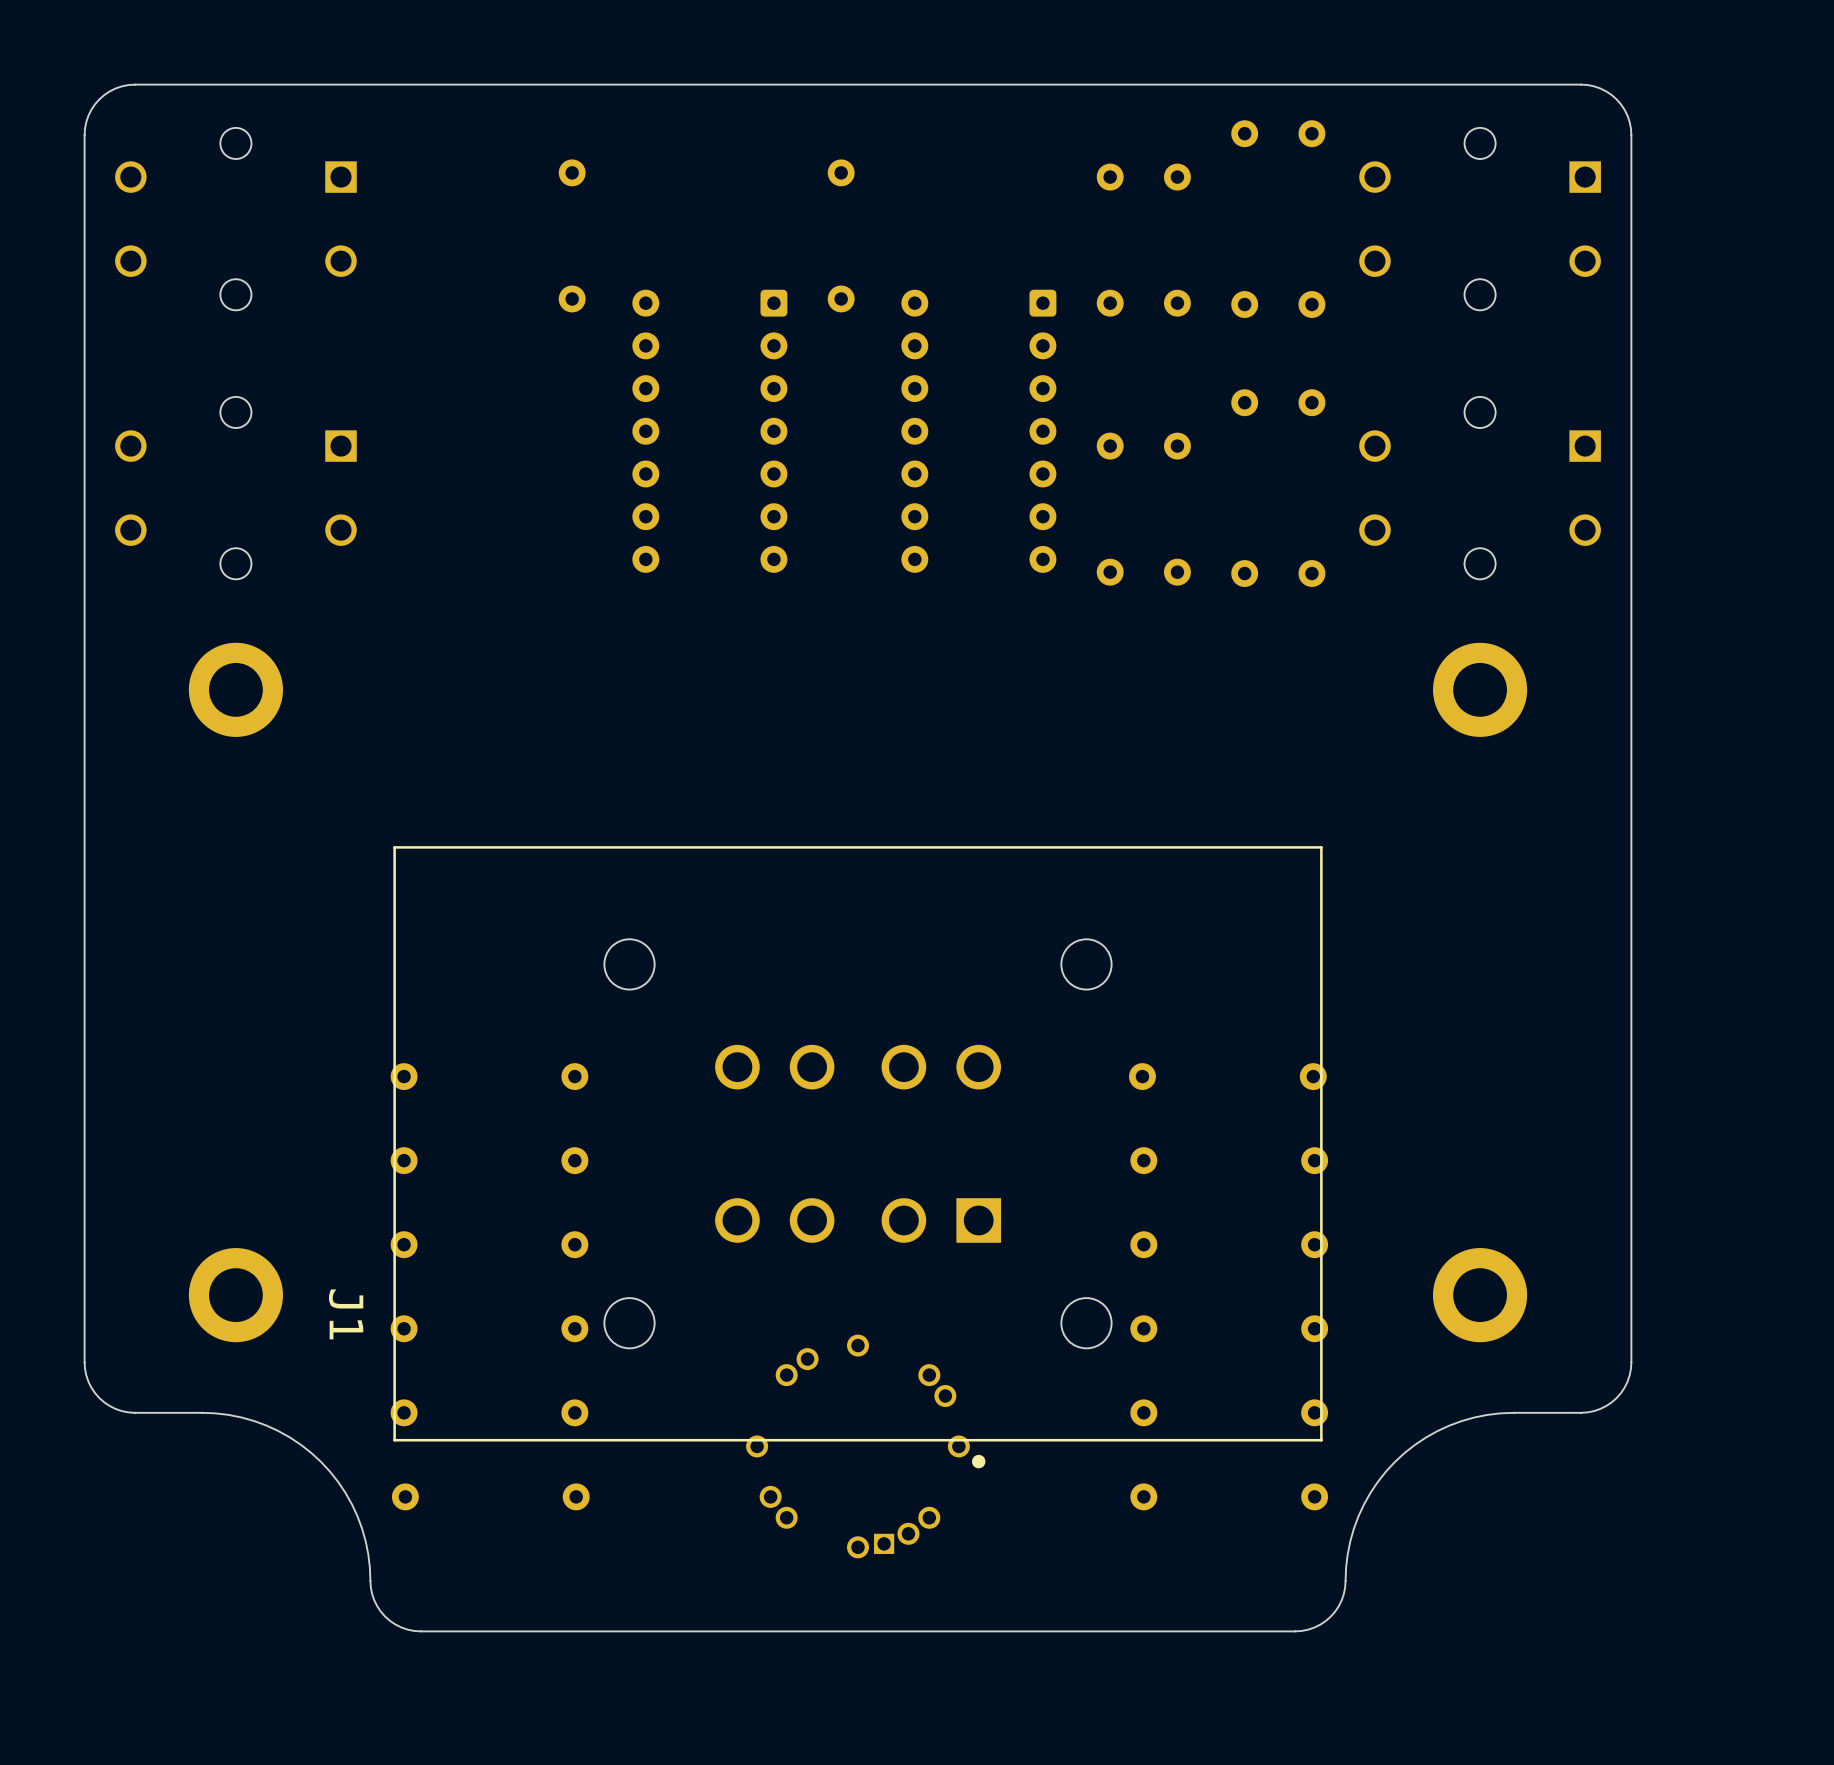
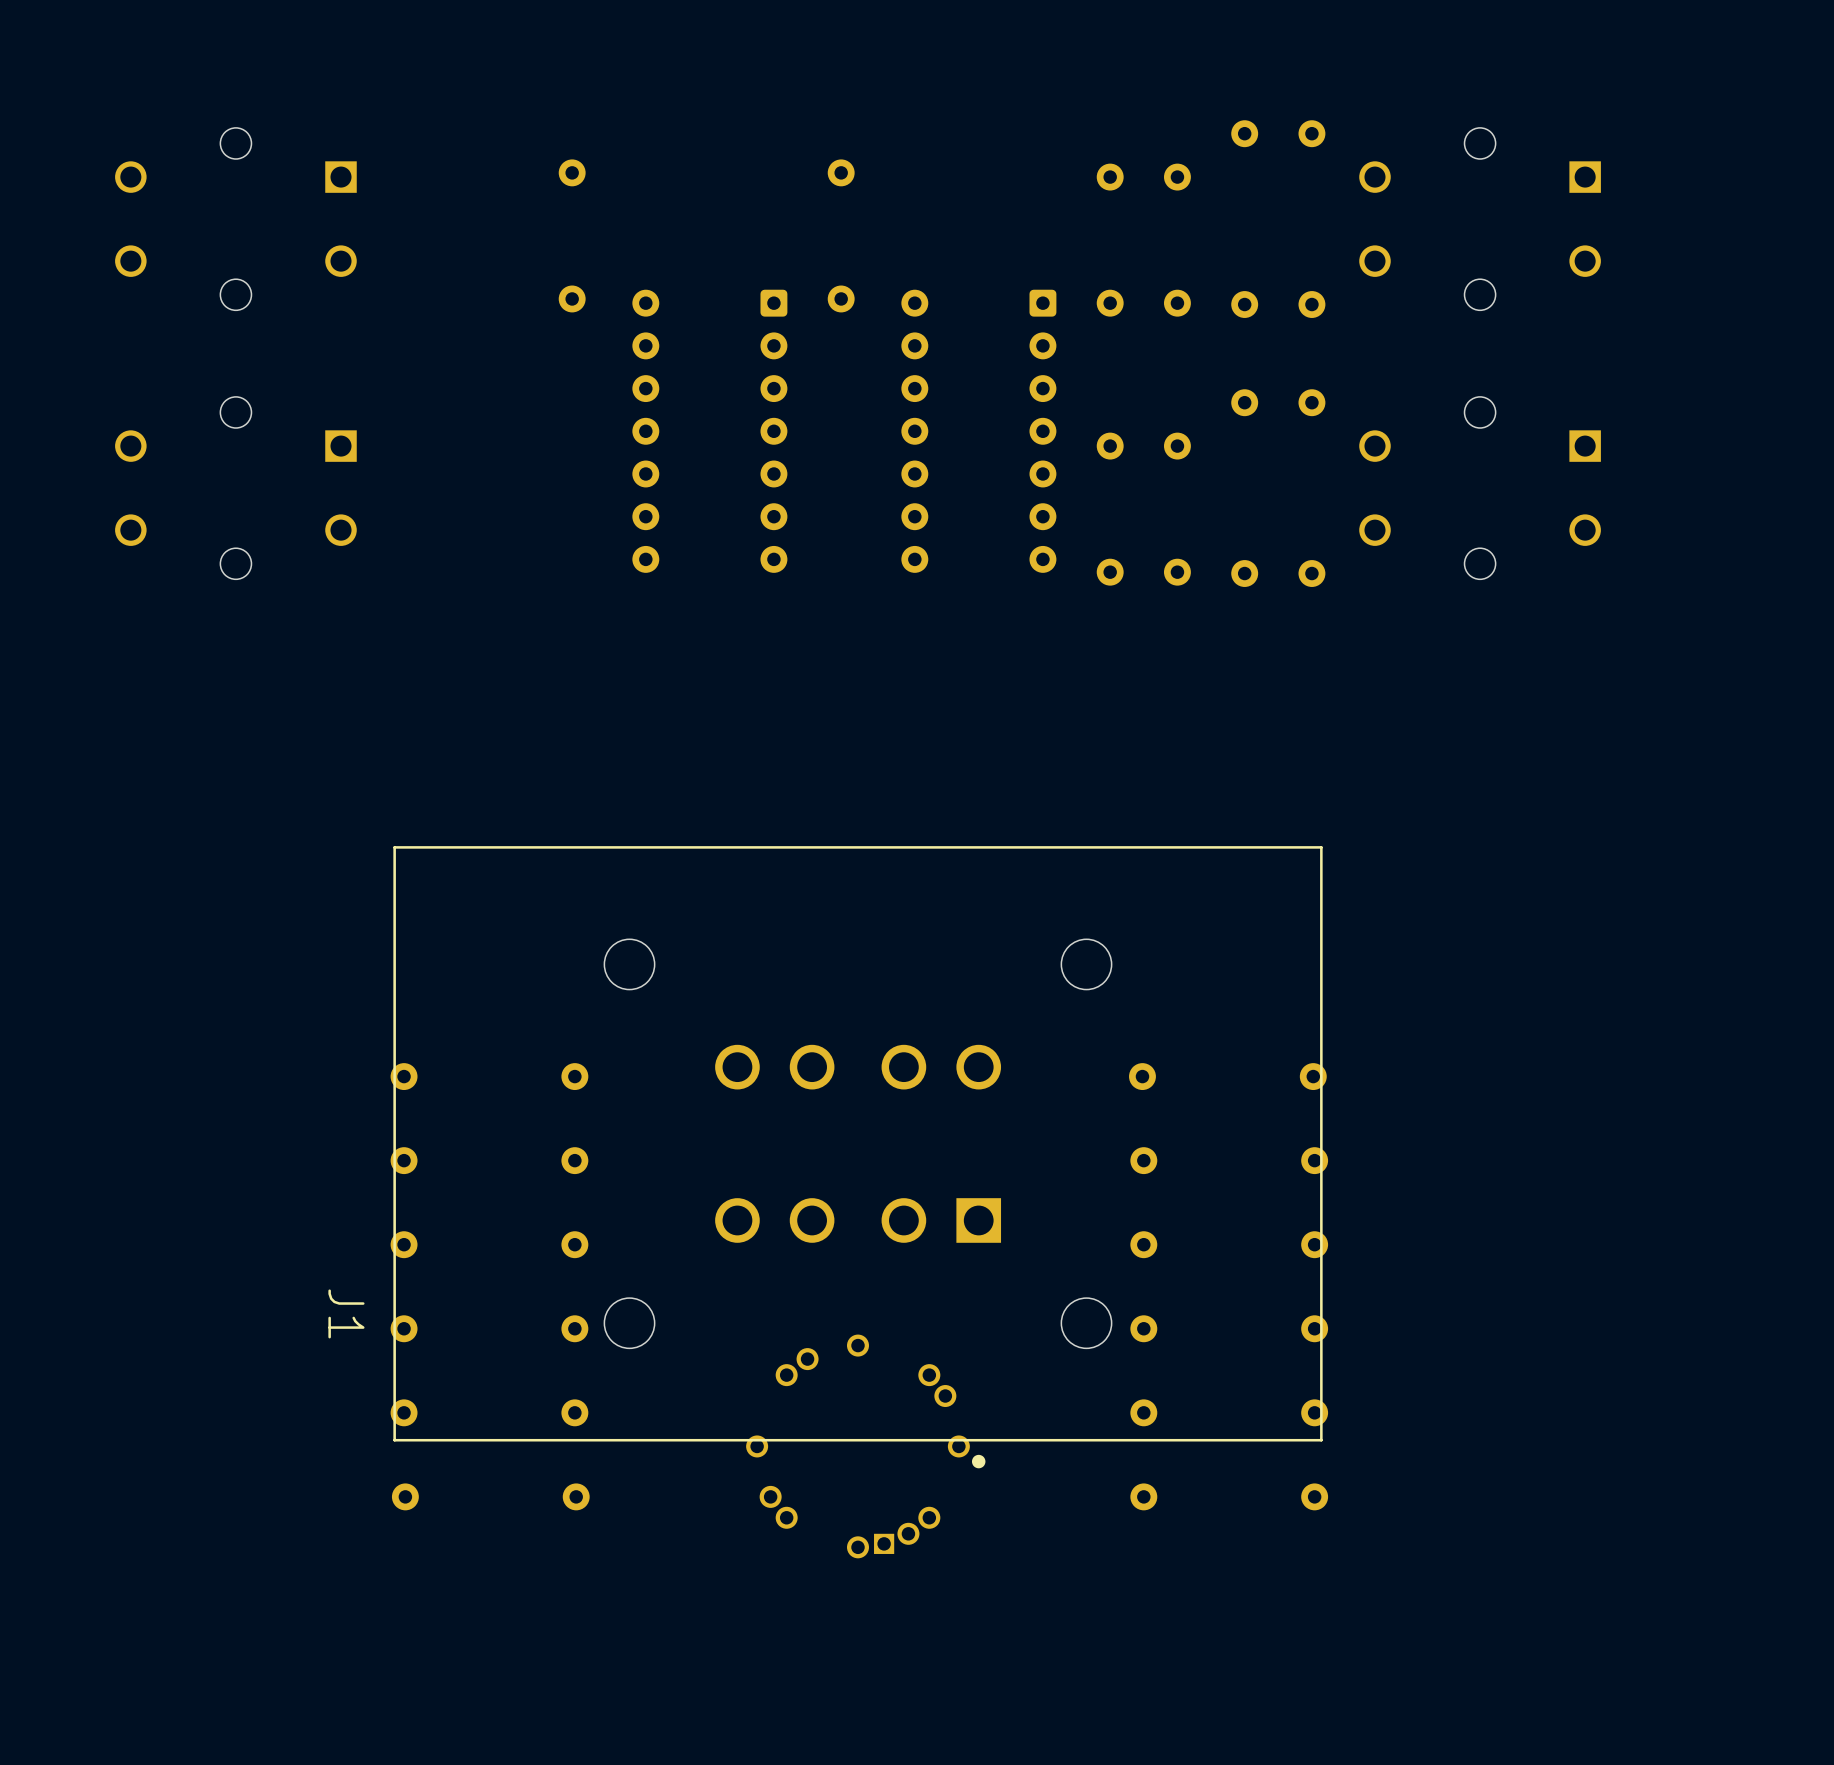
board edge: (1580, 84) (135, 84) (115, 88) (99, 99) (88, 115) (84, 135) (84, 1362) (88, 1381) (99, 1398) (115, 1408) (128, 1412) (215, 1413) (241, 1417) (266, 1425) (301, 1444) (330, 1471) (352, 1504) (365, 1541) (370, 1587) (377, 1606) (385, 1616) (395, 1624) (414, 1630) (1295, 1631) (1308, 1629) (1320, 1624) (1330, 1616) (1338, 1606) (1345, 1587) (1350, 1541) (1363, 1504) (1385, 1471) (1414, 1444) (1449, 1425) (1474, 1417) (1500, 1413) (1587, 1412) (1606, 1406) (1616, 1398) (1627, 1381) (1631, 1362) (1631, 135) (1627, 115) (1616, 99) (1600, 88) (1580, 84) -> none
part: (235, 689) -> none
part: (1480, 689) -> none
part: (235, 1295) -> none
part: (1480, 1295) -> none

